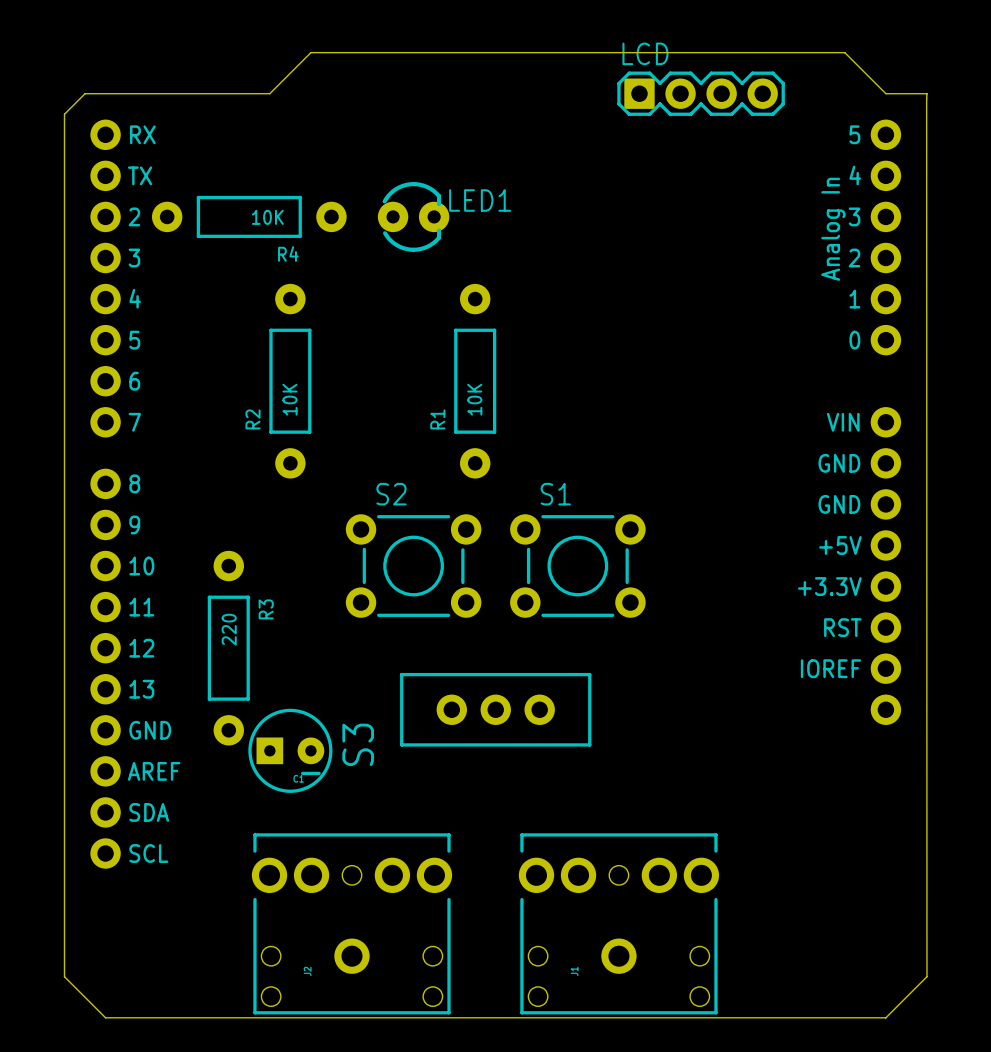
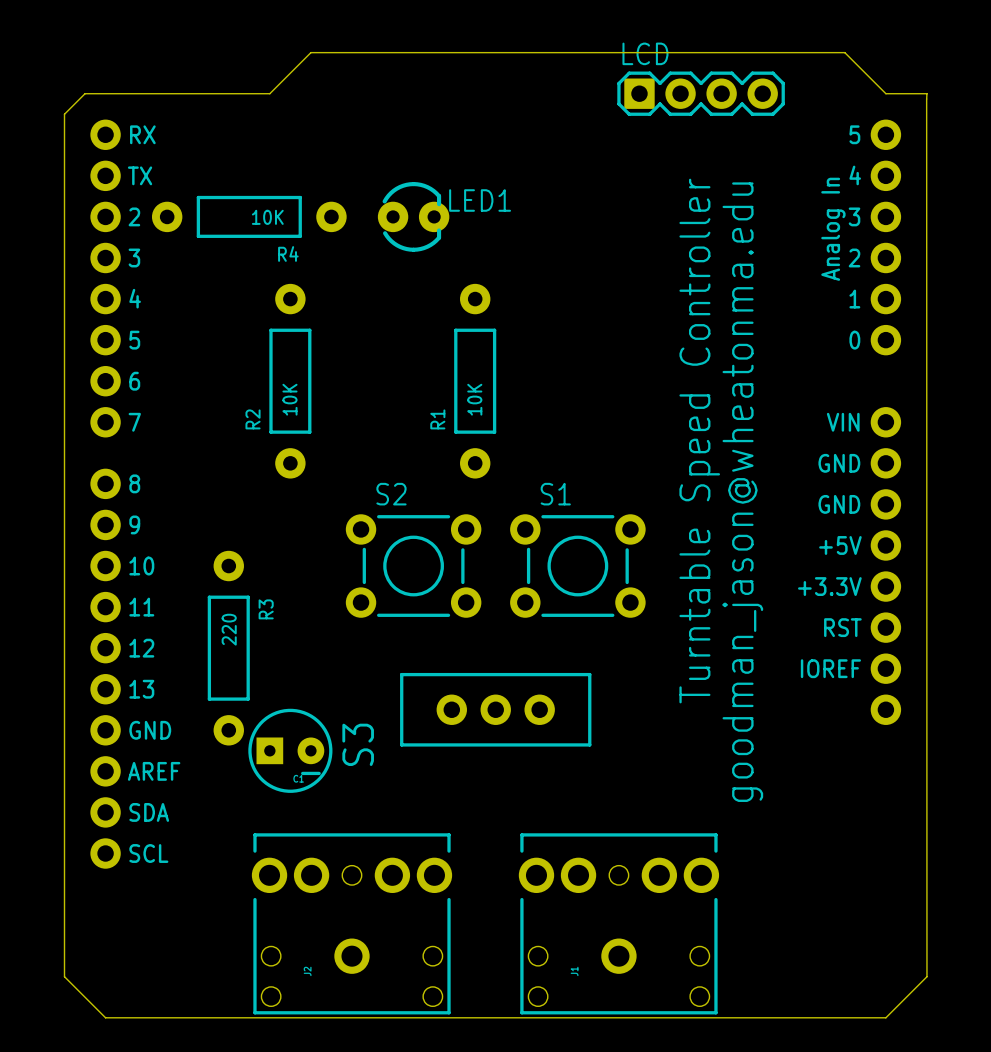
text: none -> Turntable Speed Controller (699, 441)
text: none -> goodman_jason@wheatonma.edu (742, 492)

